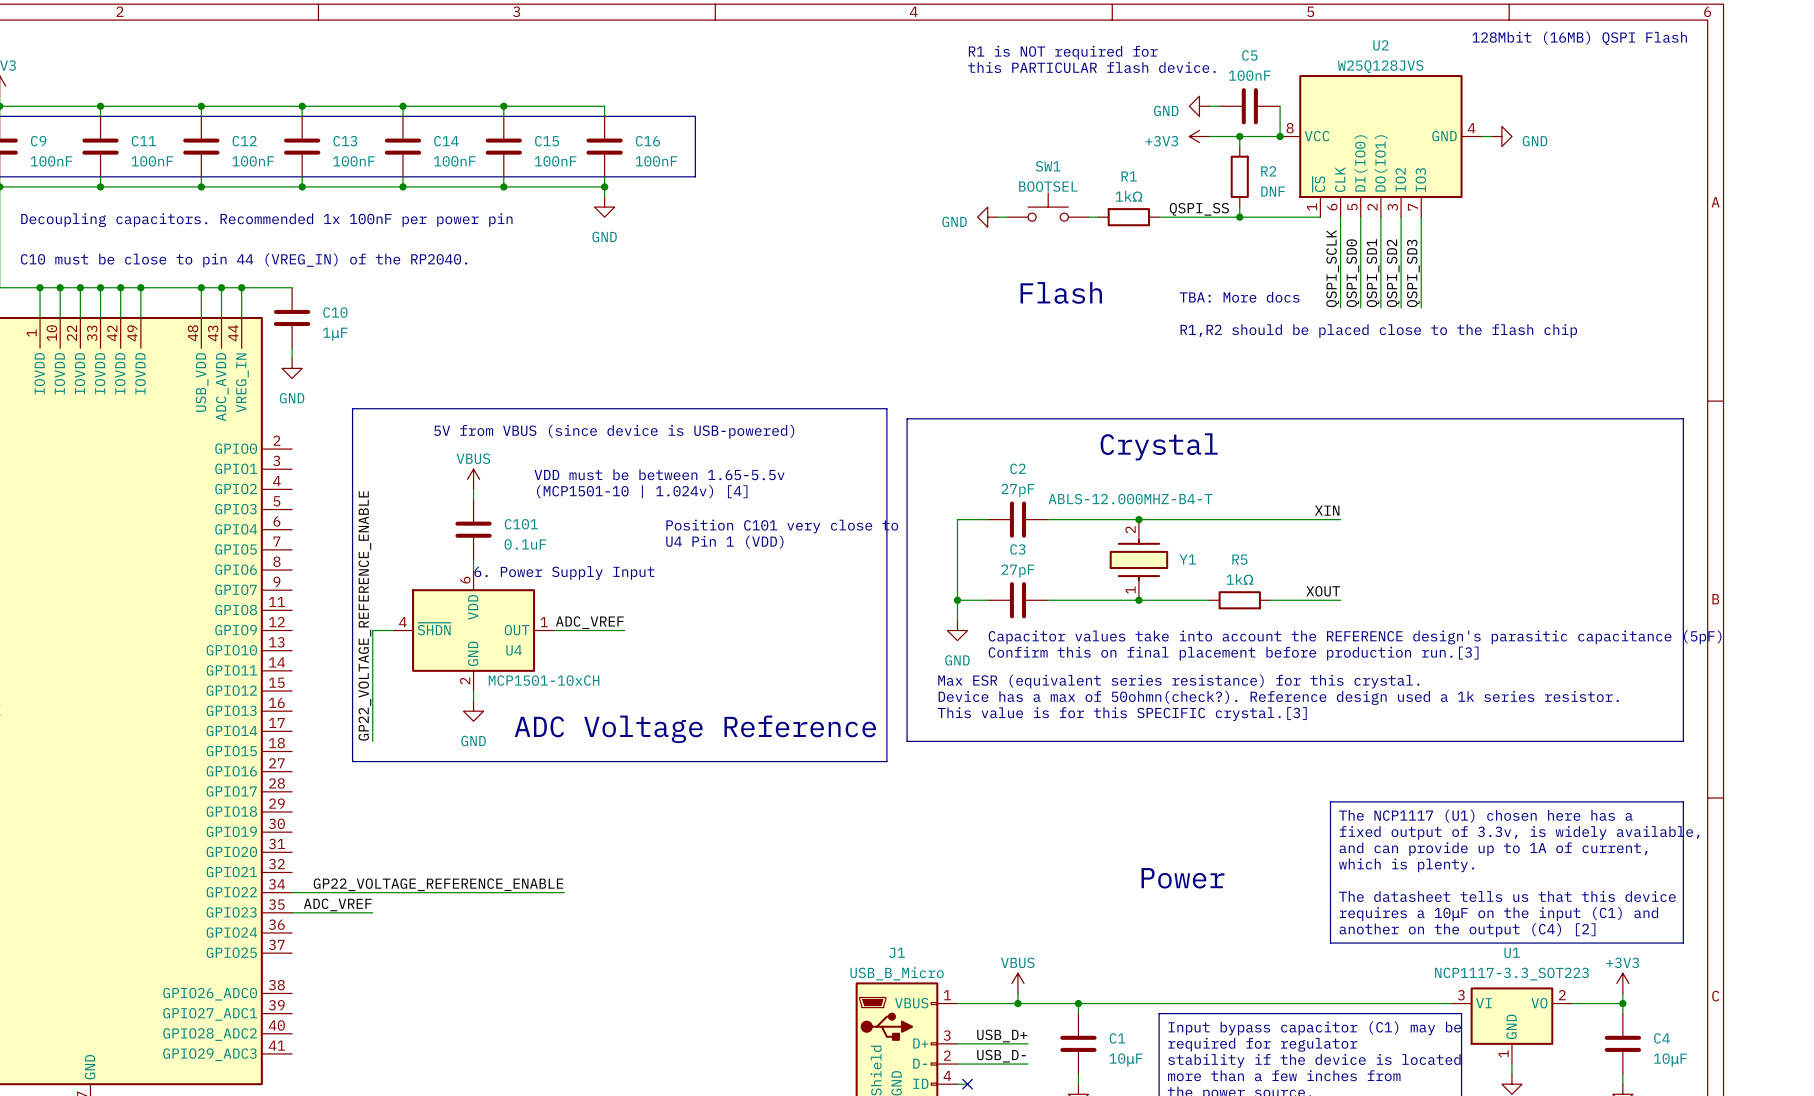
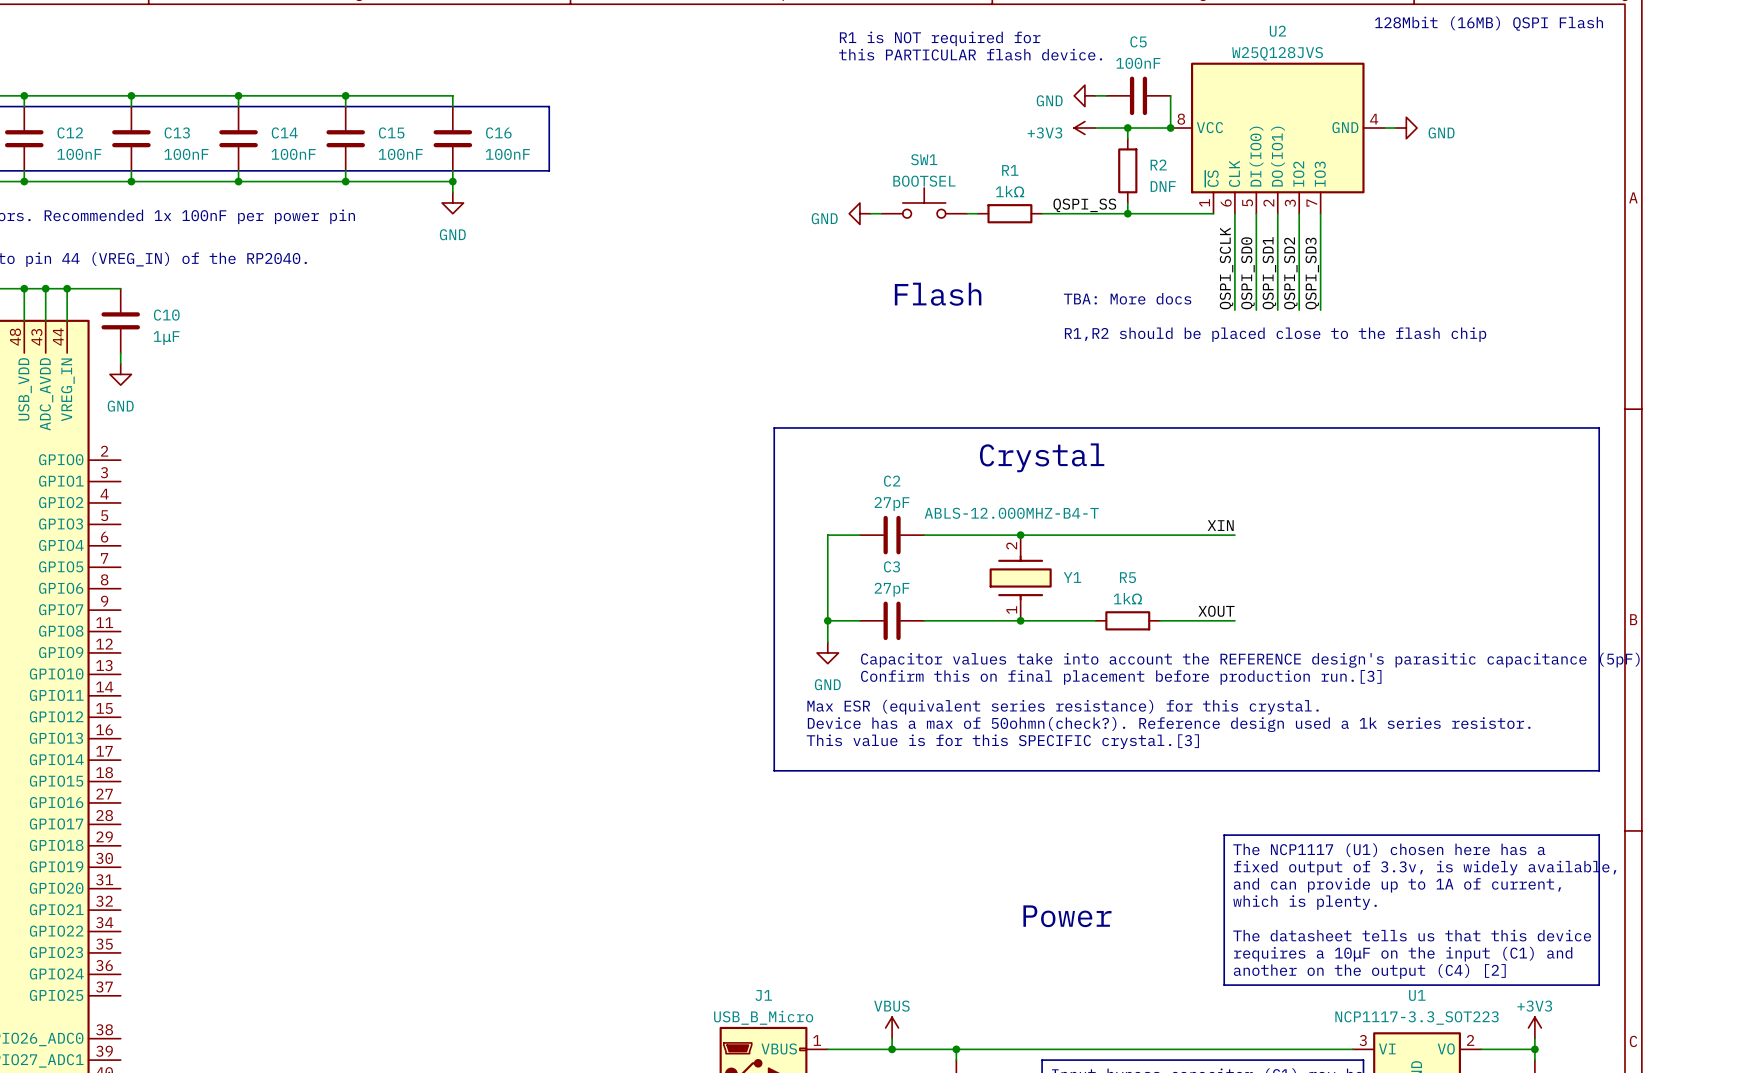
line: (352, 408) (886, 408) (886, 761) (352, 761) (352, 408) -> none
text: 5V from VBUS (since device is USB-powered) (614, 431) -> none
text: VDD must be between 1.65-5.5v (659, 474) -> none
power symbol: VBUS (473, 479) -> none
wire: (473, 489) (473, 499) -> none
text: (MCP1501-10 | 1.024v) [4] (642, 491) -> none
text: Position C101 very close to (782, 526) -> none
C101: 0.1uF (473, 529) -> none
text: U4 Pin 1 (VDD) (724, 542) -> none
wire: (473, 559) (473, 570) -> none
text: 6. Power Supply Input (564, 572) -> none
label: GP22_VOLTAGE_REFERENCE_ENABLE (364, 615) -> none
label: ADC_VREF (589, 622) -> none
wire: (392, 630) (372, 630) (372, 741) -> none
U4: MCP1501-10xCH (473, 630) -> none
wire: (554, 630) (624, 630) -> none
wire: (473, 691) (473, 701) -> none
power symbol: GND (473, 711) -> none
text: ADC Voltage Reference (695, 729) -> none
label: GP22_VOLTAGE_REFERENCE_ENABLE (438, 884) -> none
wire: (292, 892) (564, 892) -> none
label: ADC_VREF (337, 904) -> none
wire: (292, 912) (372, 912) -> none

